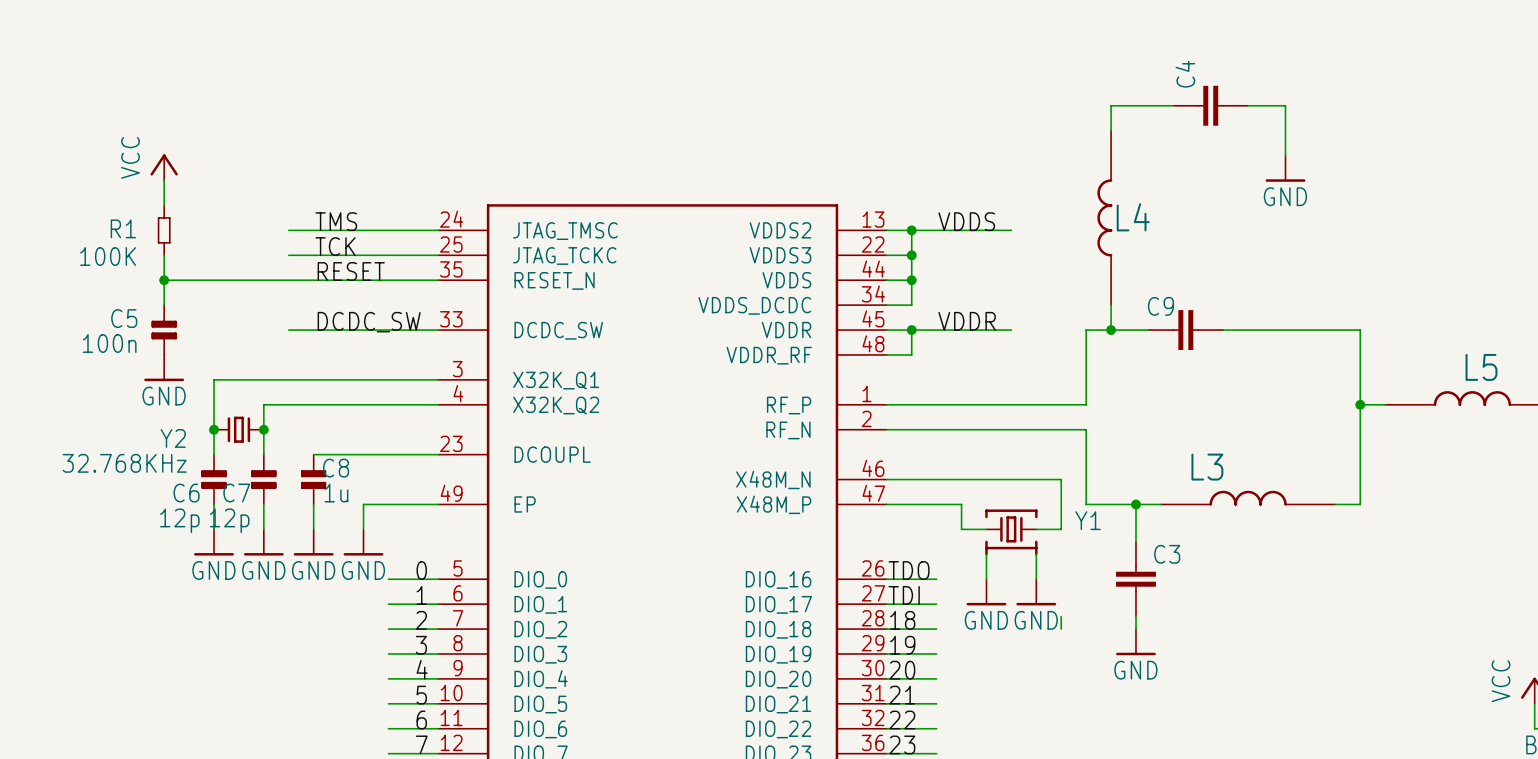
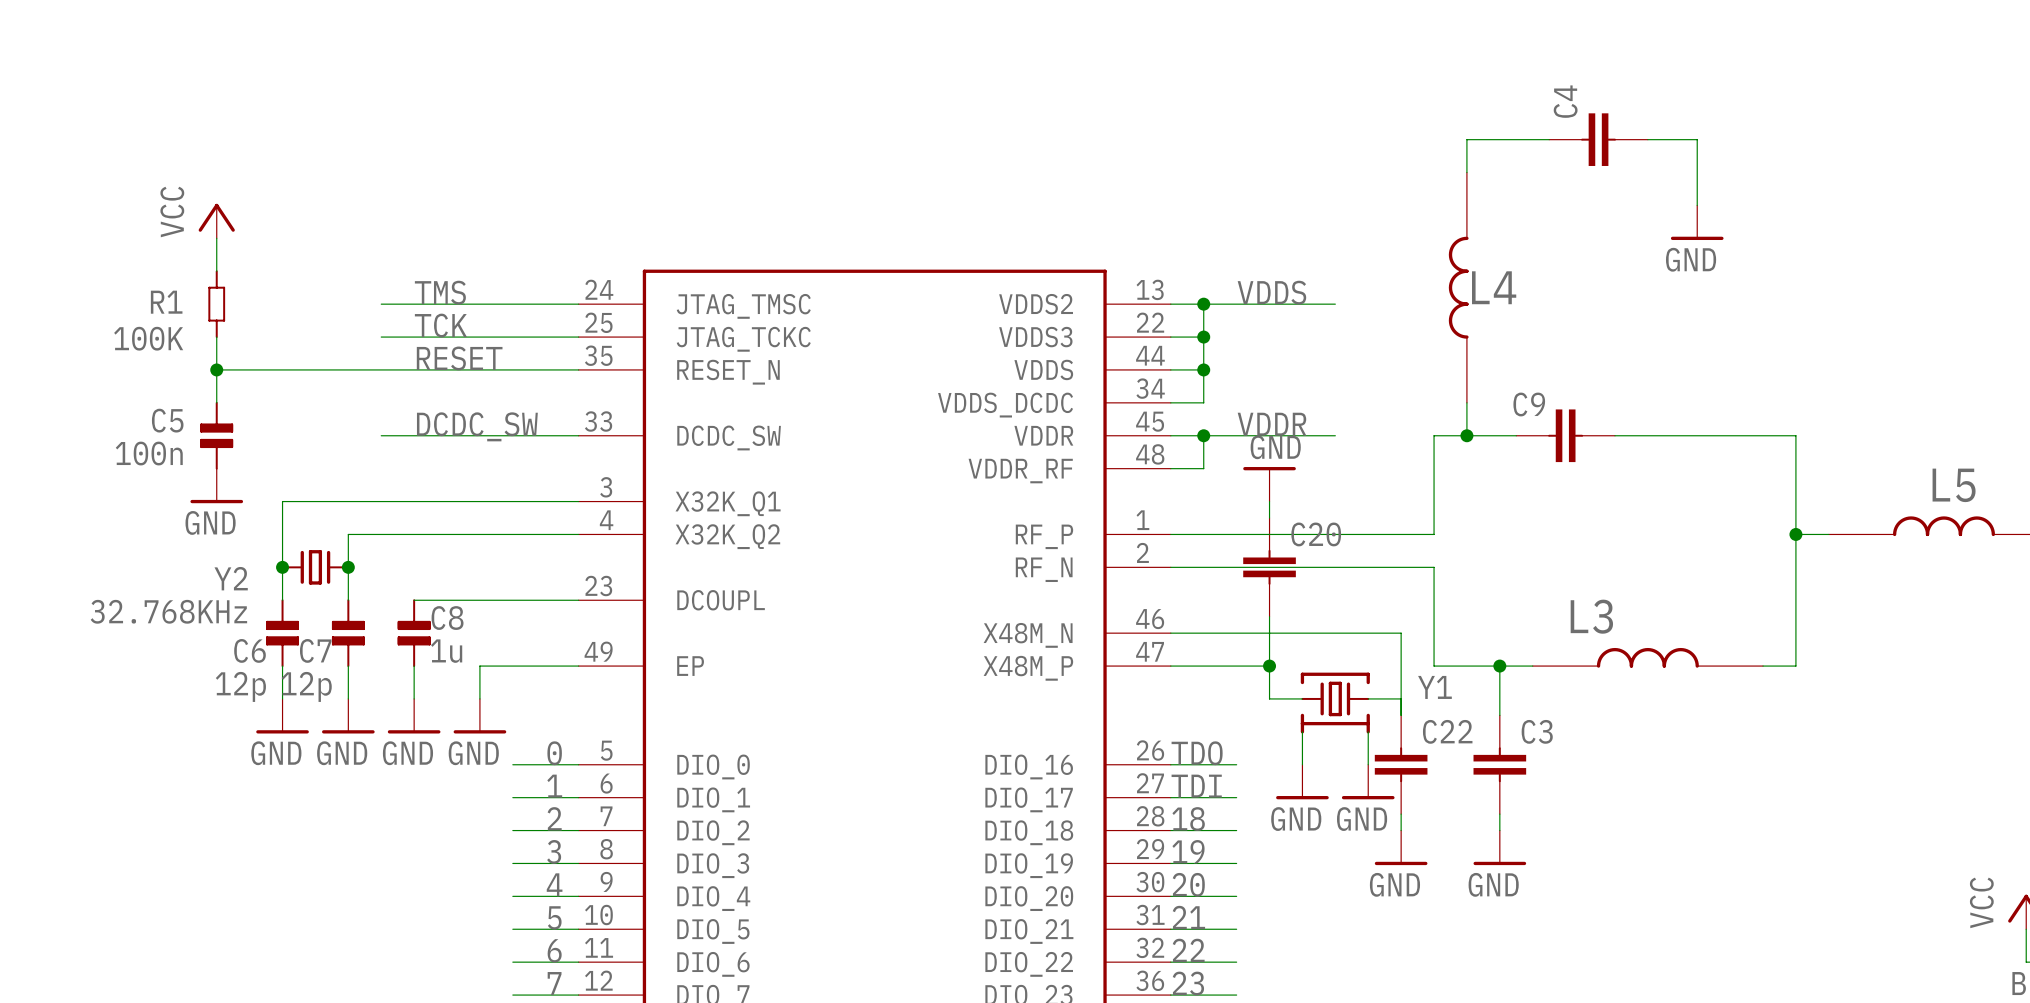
power symbol: none -> GND (1269, 484)
wire: none -> (1269, 501) (1269, 518)
C20: none -> (1269, 567)
wire: none -> (1269, 616) (1269, 666)
junction: none -> (1269, 666)
wire: none -> (1401, 698) (1401, 715)
C22: none -> (1401, 764)
power symbol: none -> GND (1401, 847)

